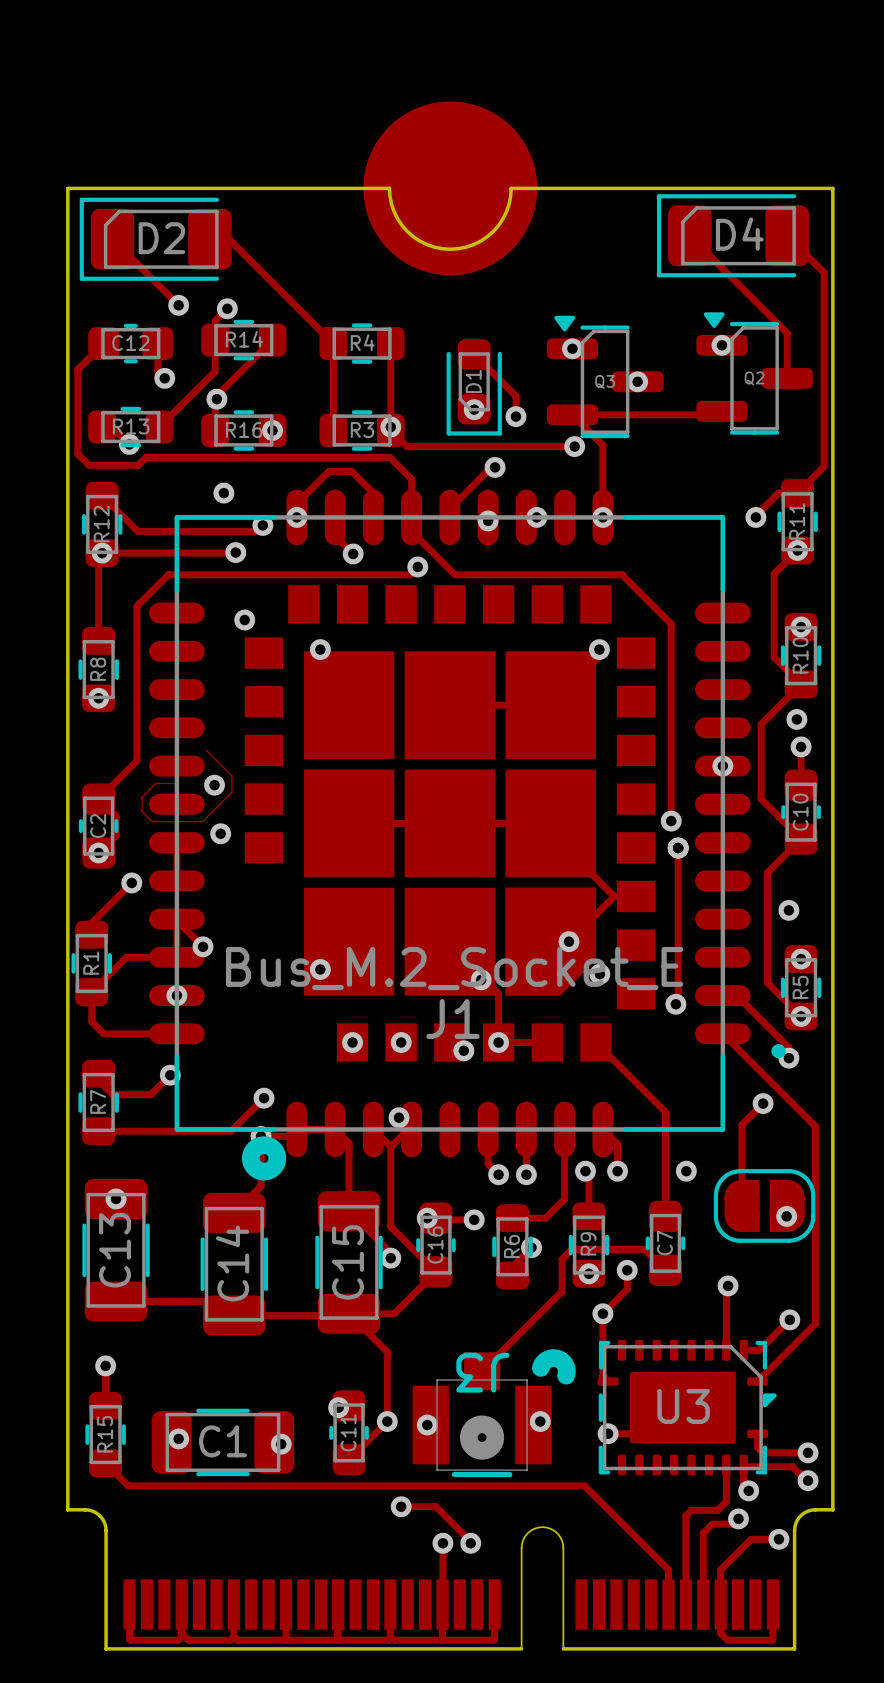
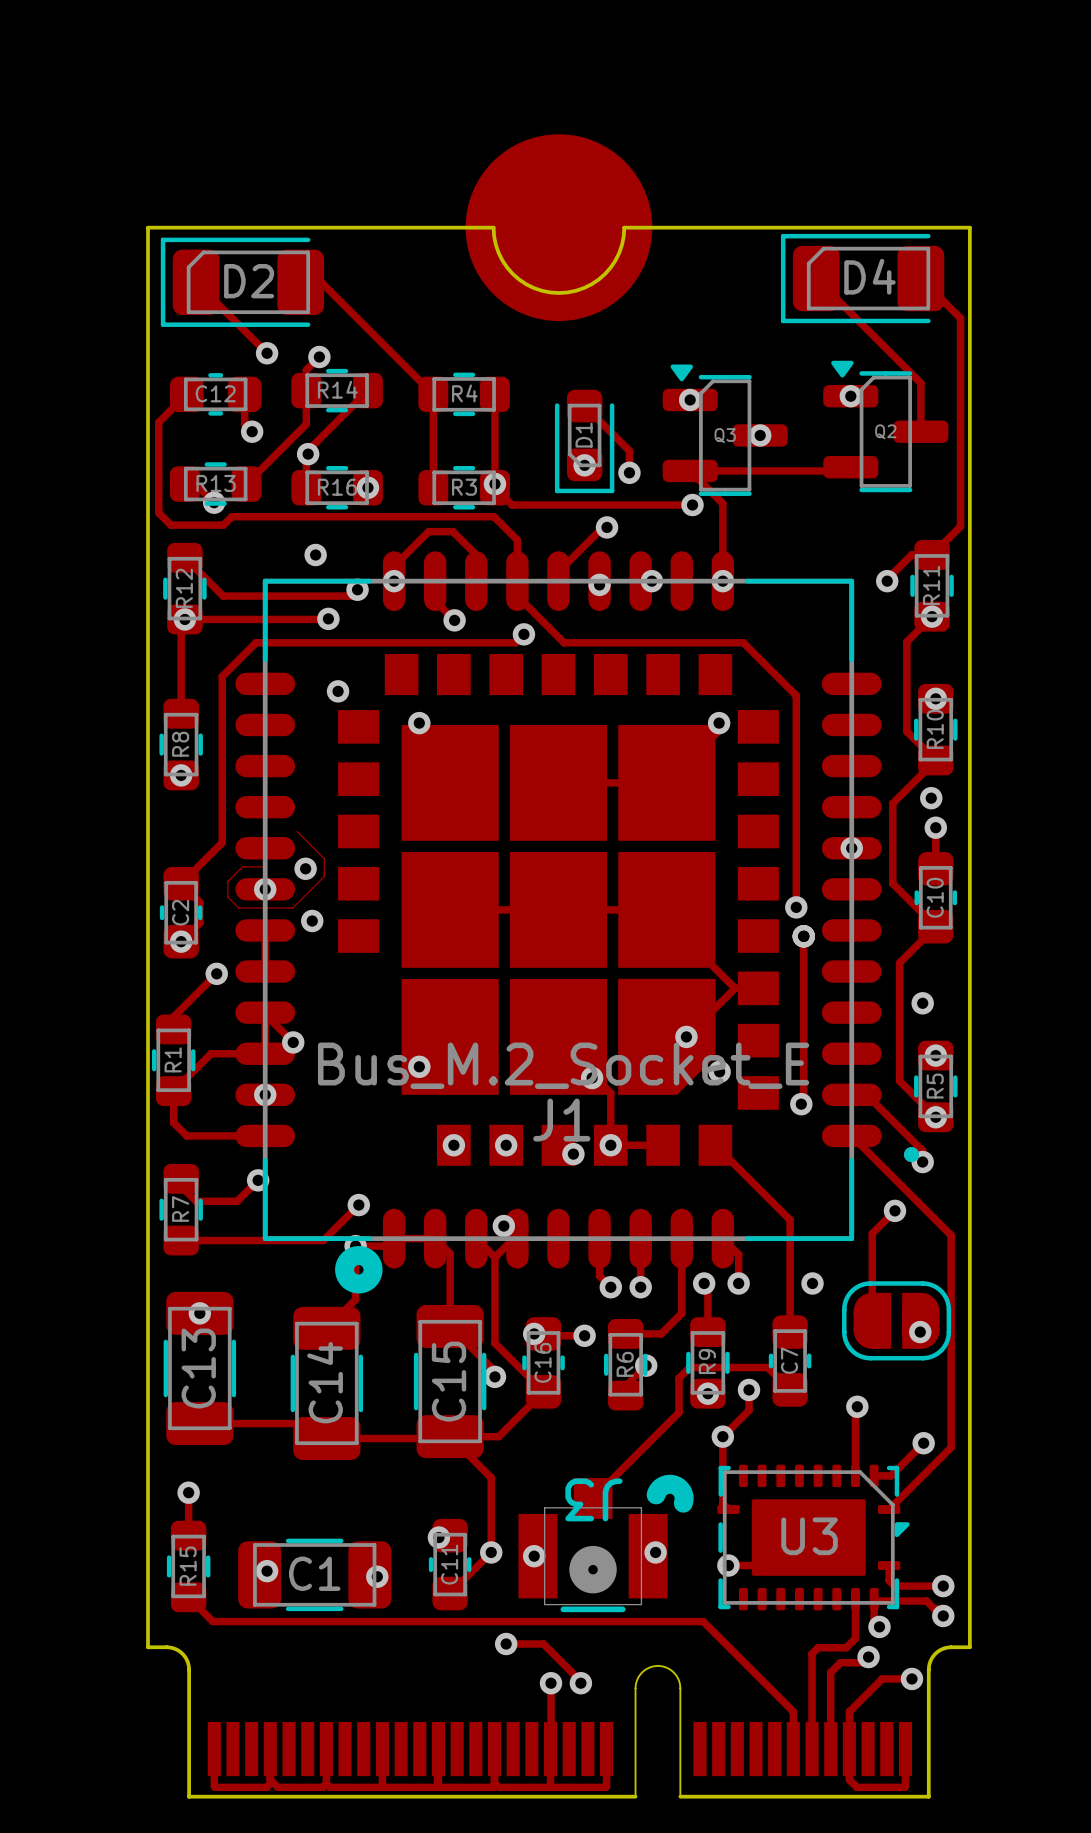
via: none -> (265, 889)

